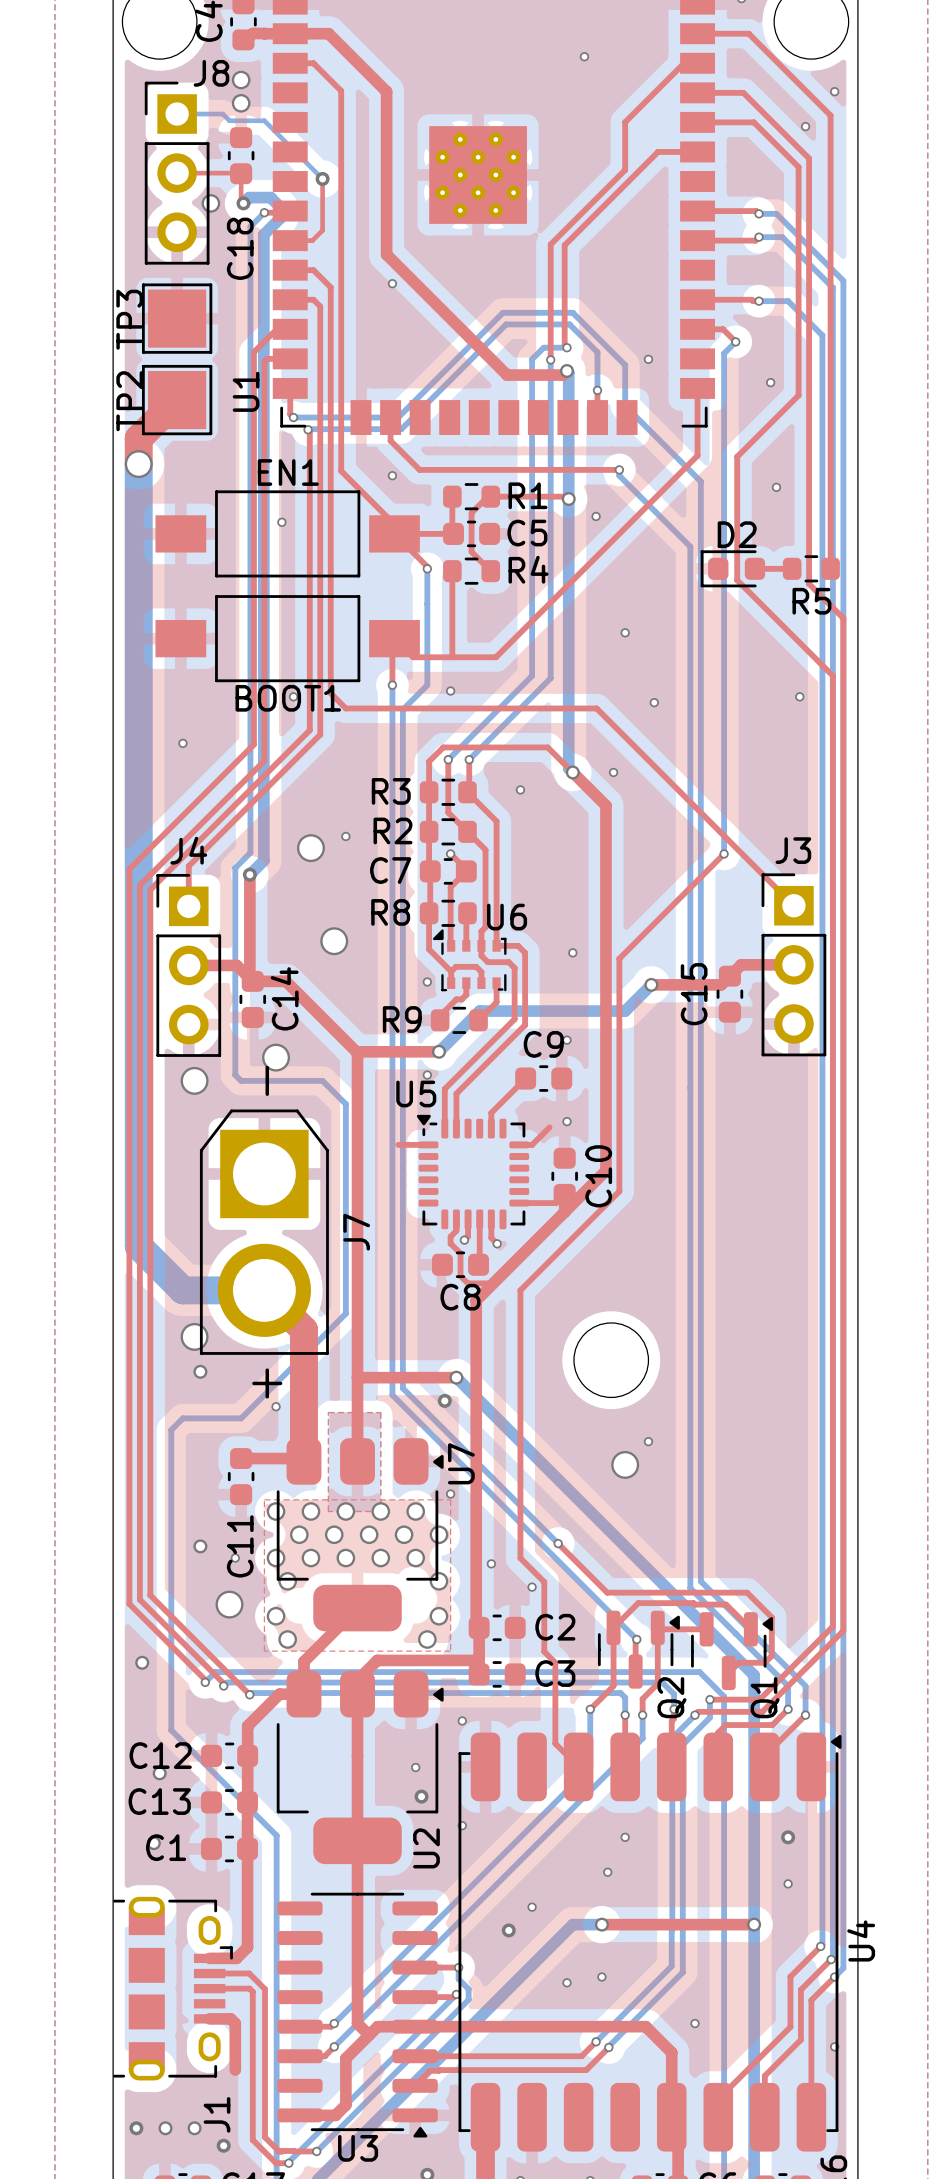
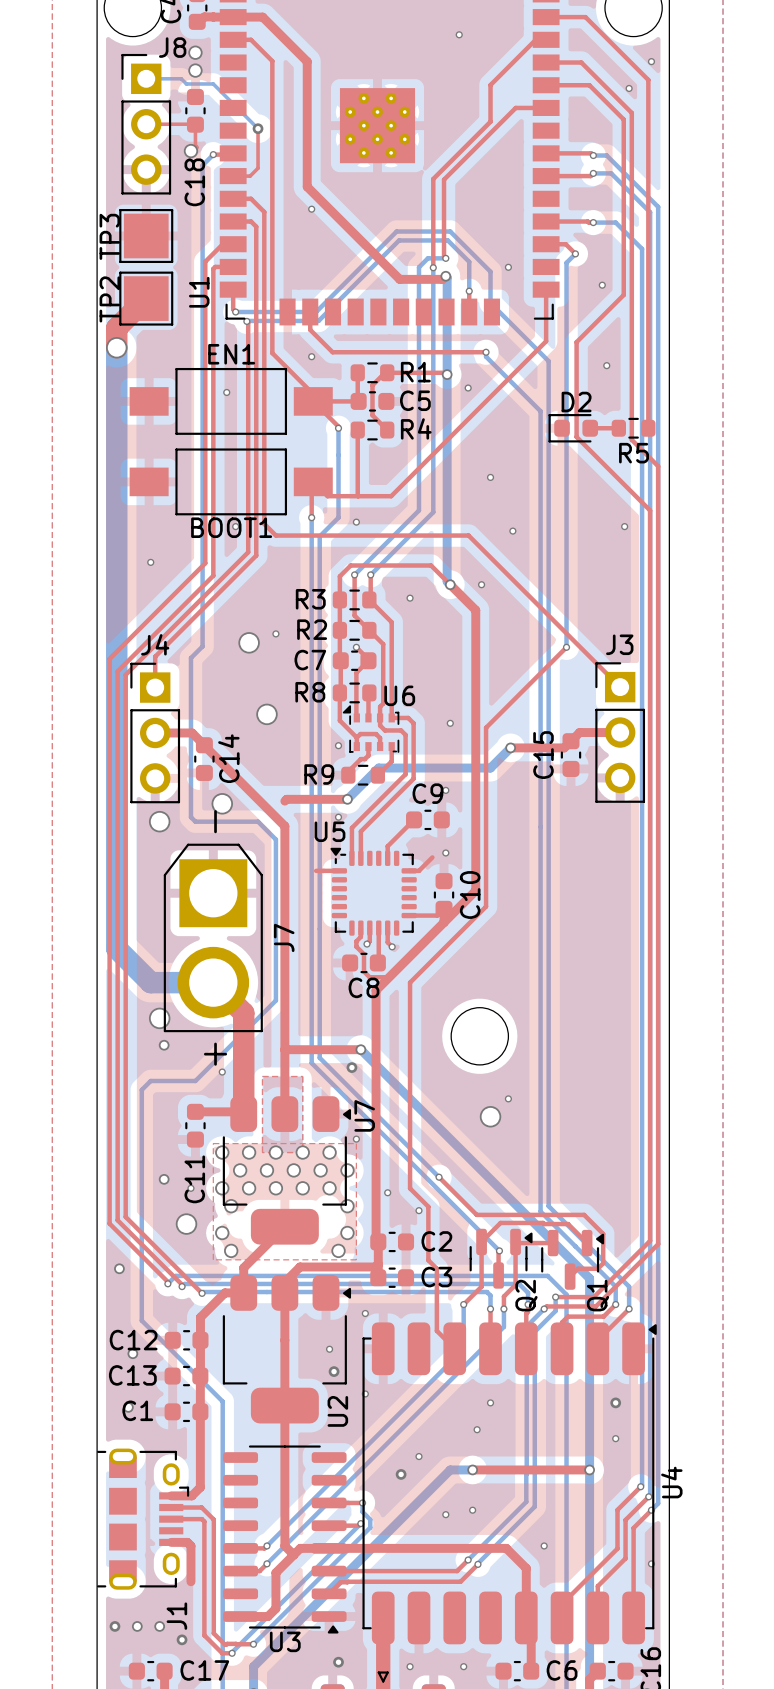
via position: (210, 203) -> (190, 151)
bottom track: (243, 203) (249, 197) (270, 197) (280, 207) (280, 217) (263, 234) (263, 860) (249, 874) -> none
via: (243, 203) -> none
top track: (249, 874) (249, 978) -> none
via: (249, 874) -> none
top track: (252, 981) (285, 981) (357, 1052) (357, 1086) -> (204, 745) (284, 826)

